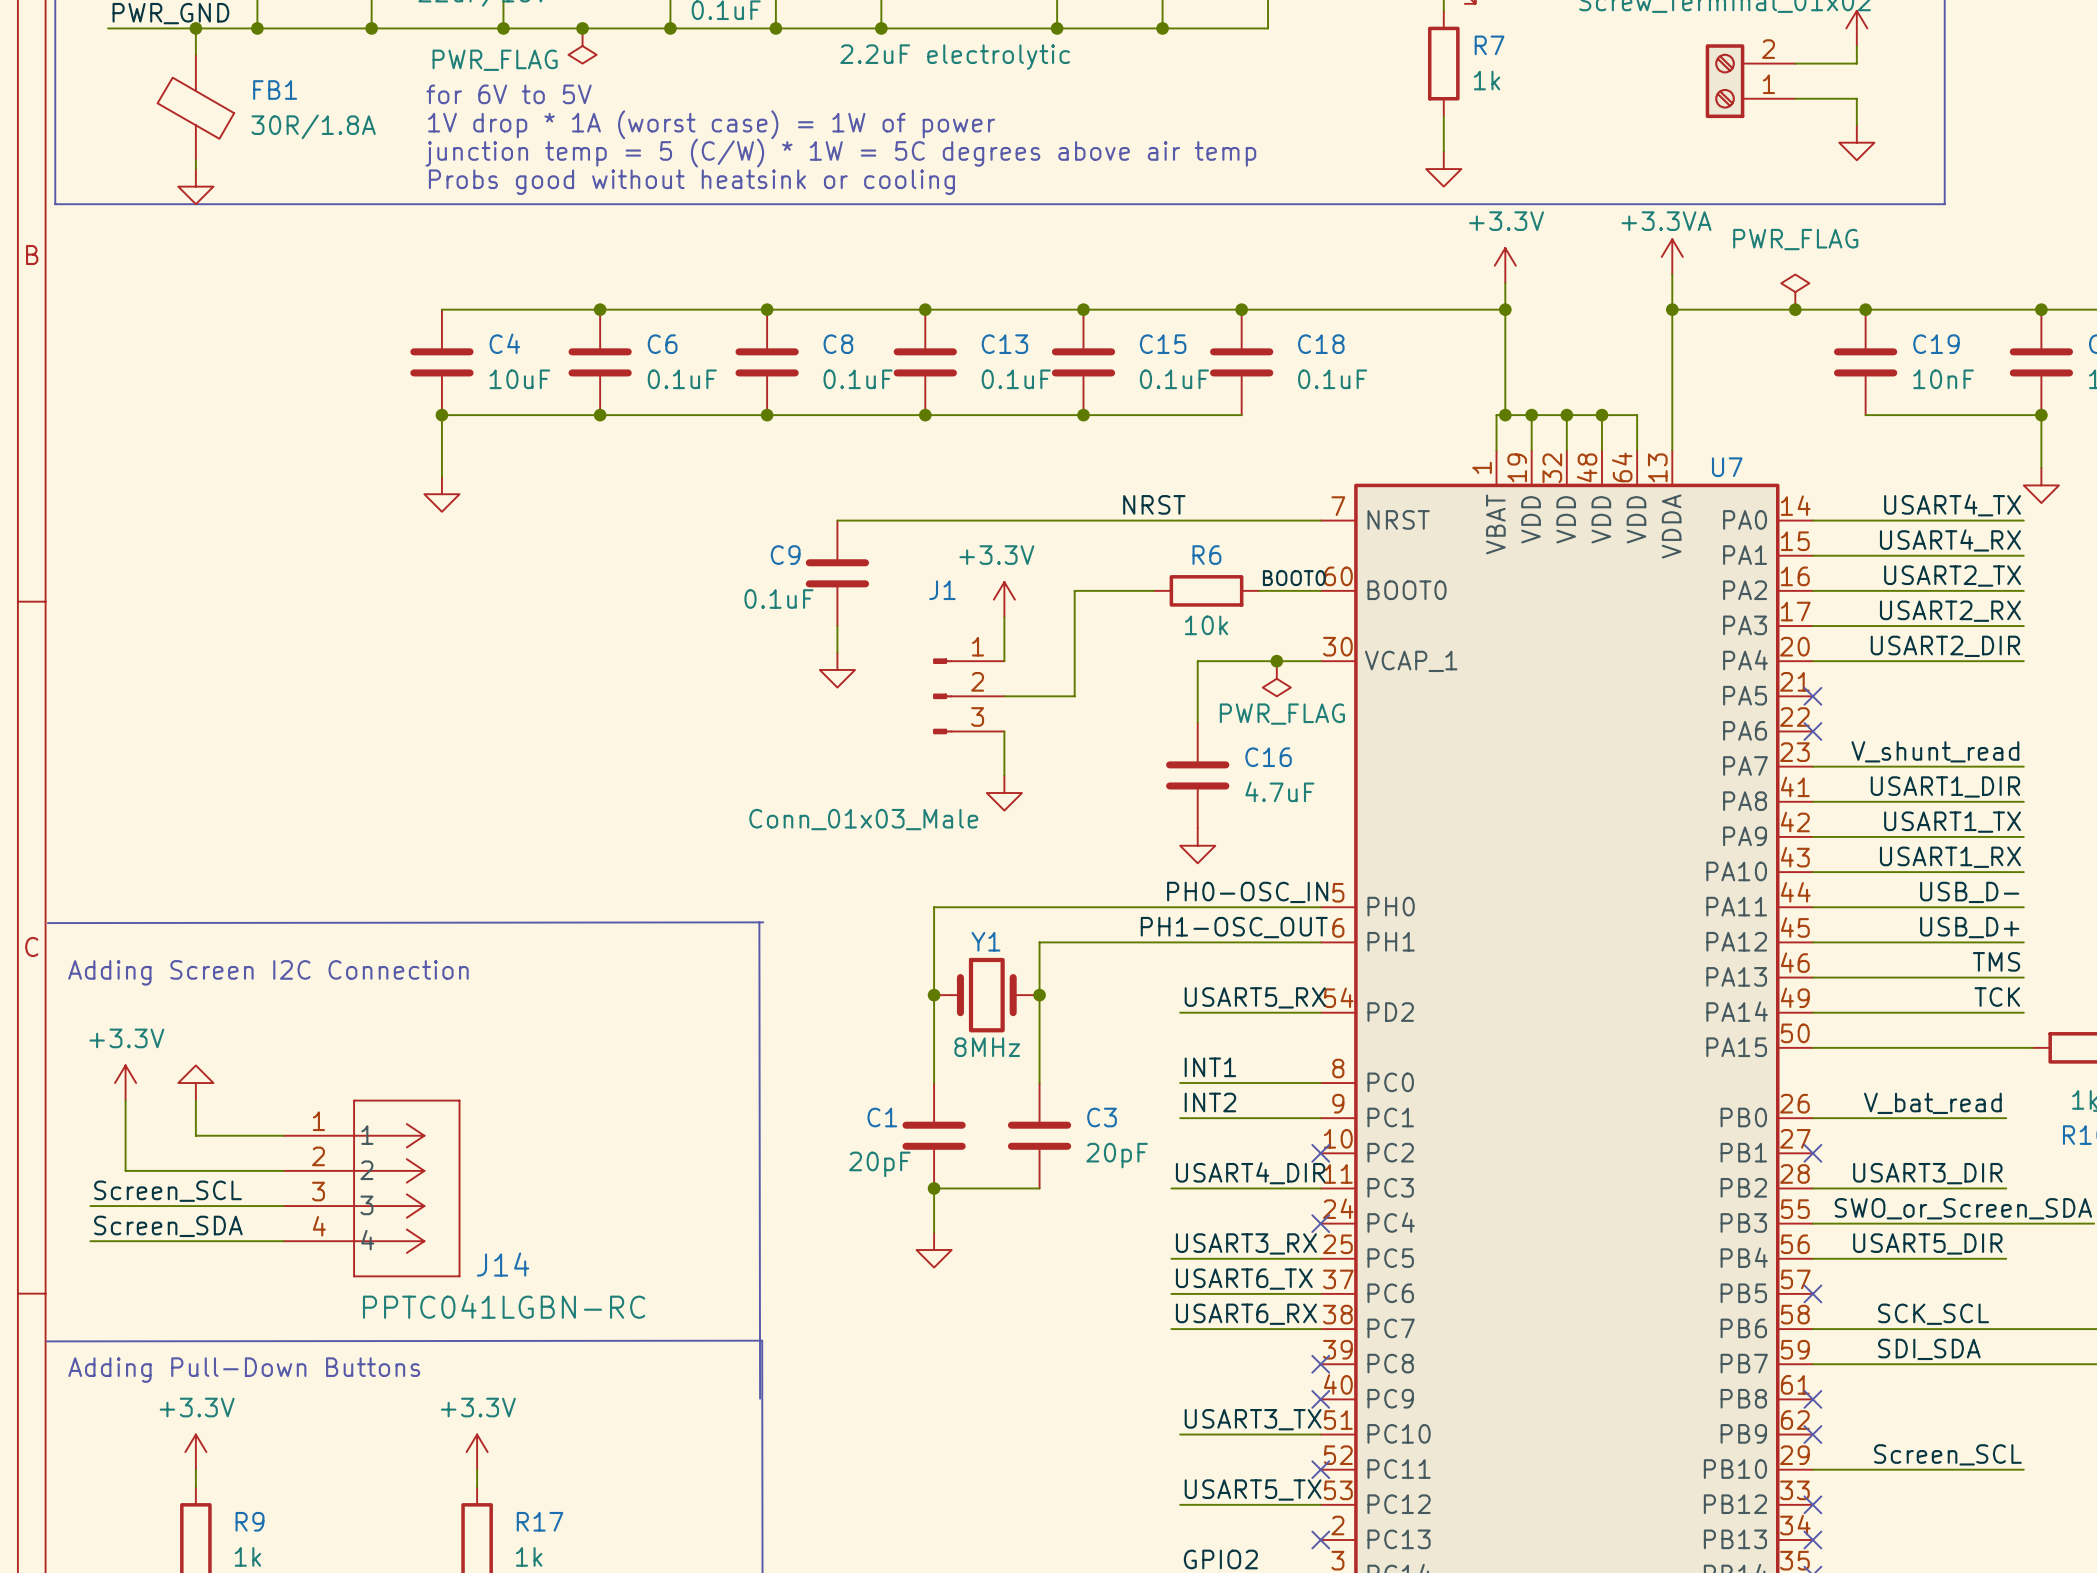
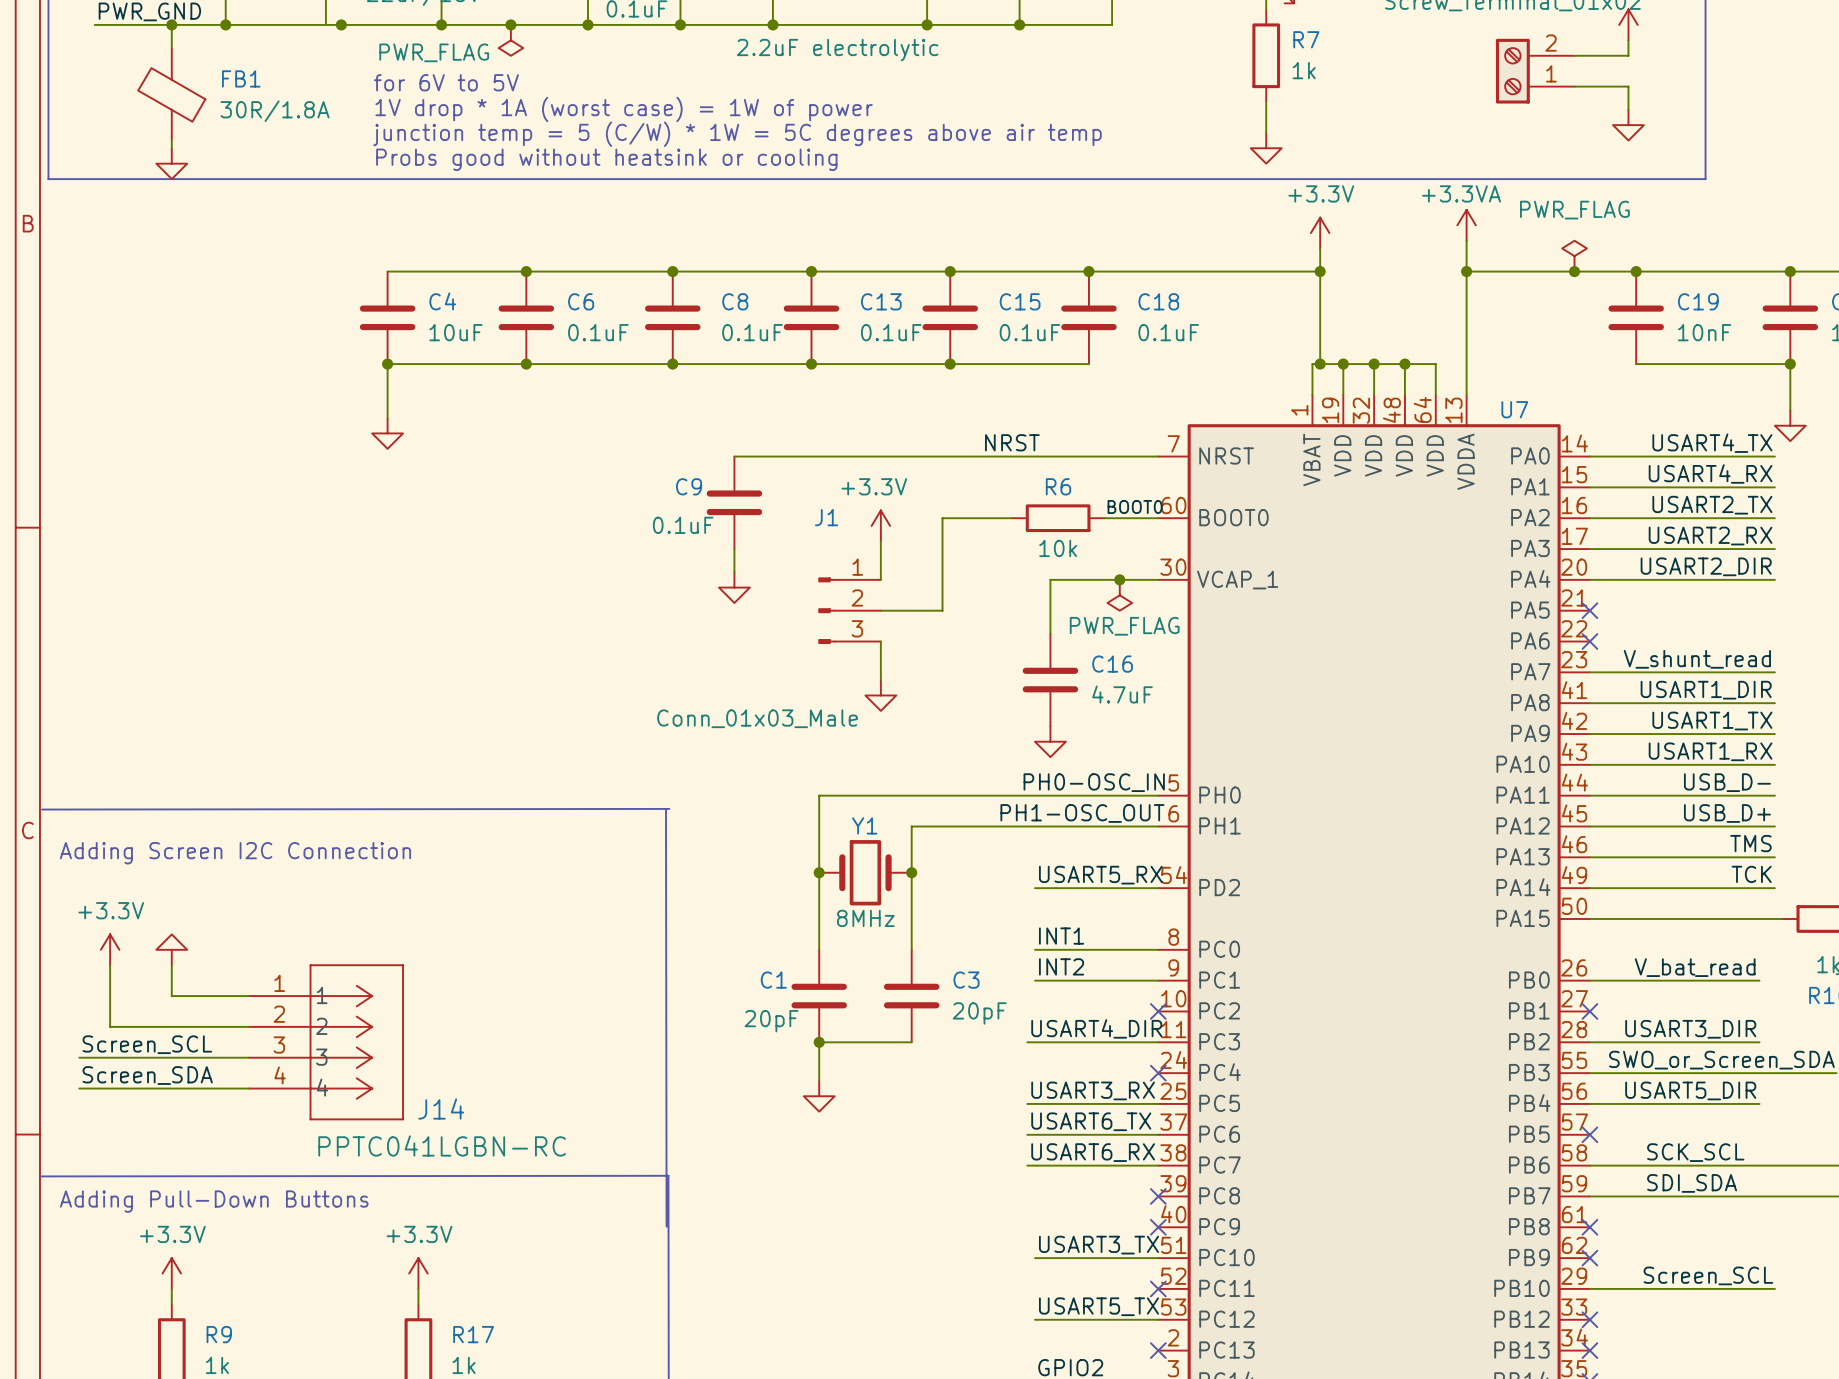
junction position: (371, 28) -> (341, 24)

